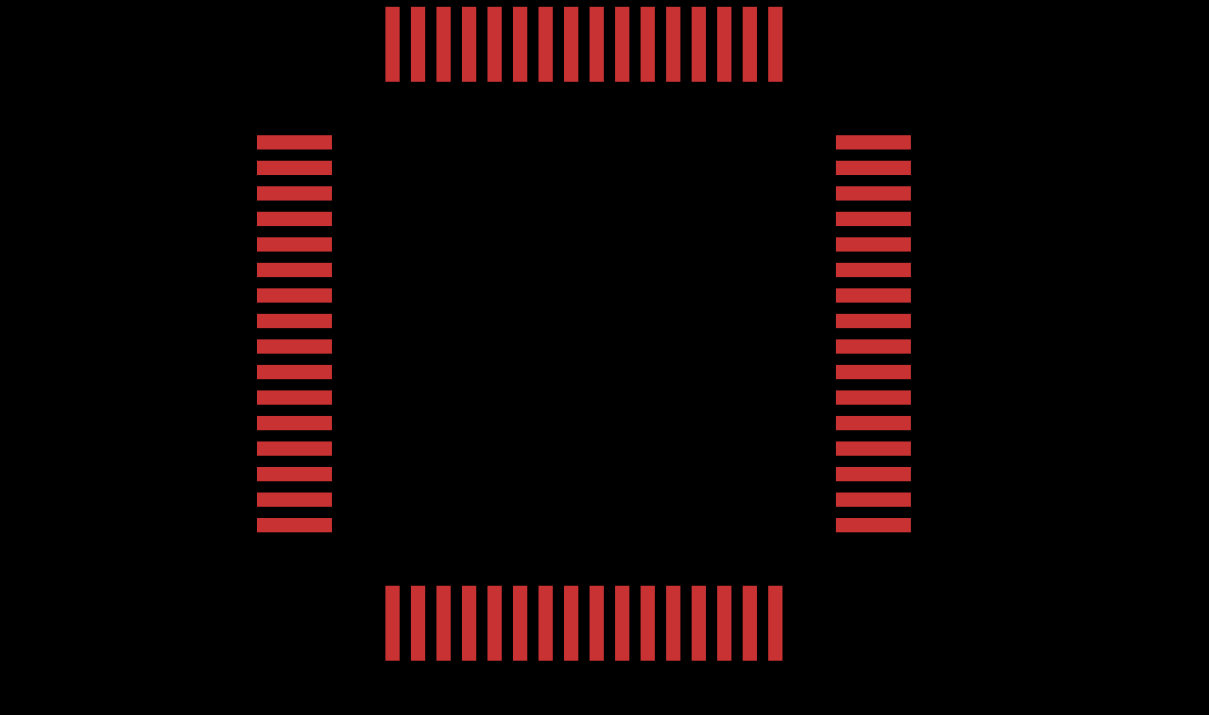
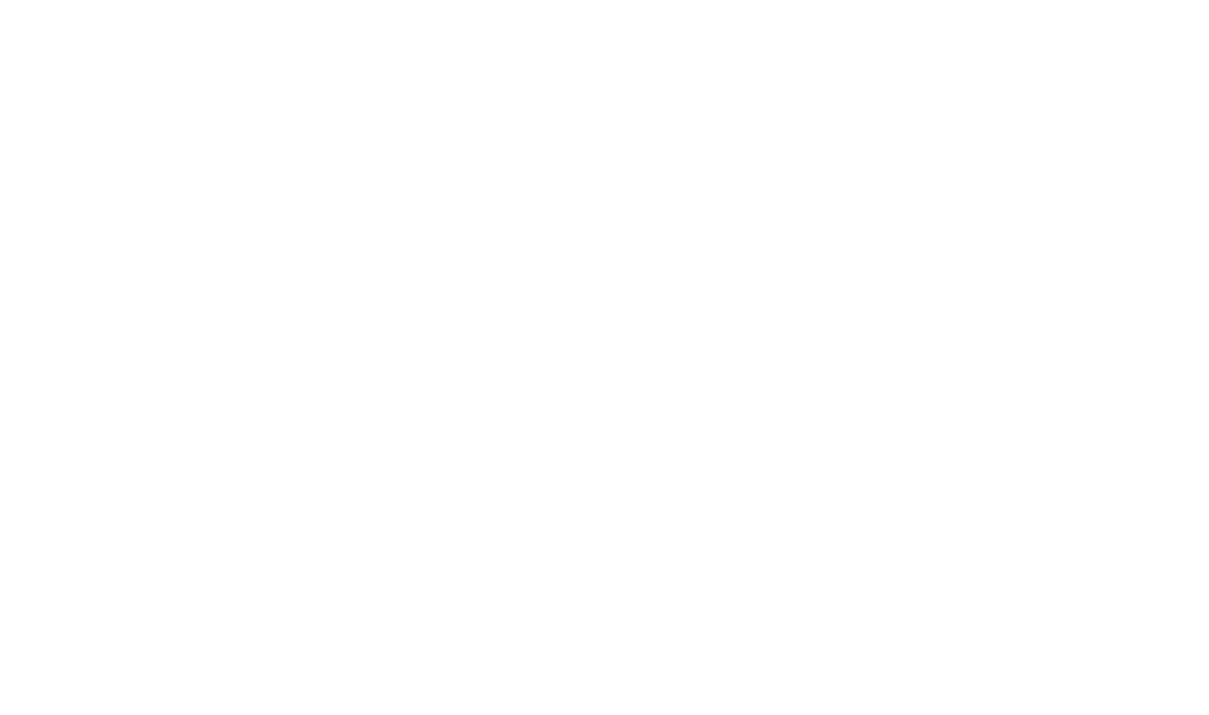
part: (583, 333) -> none

